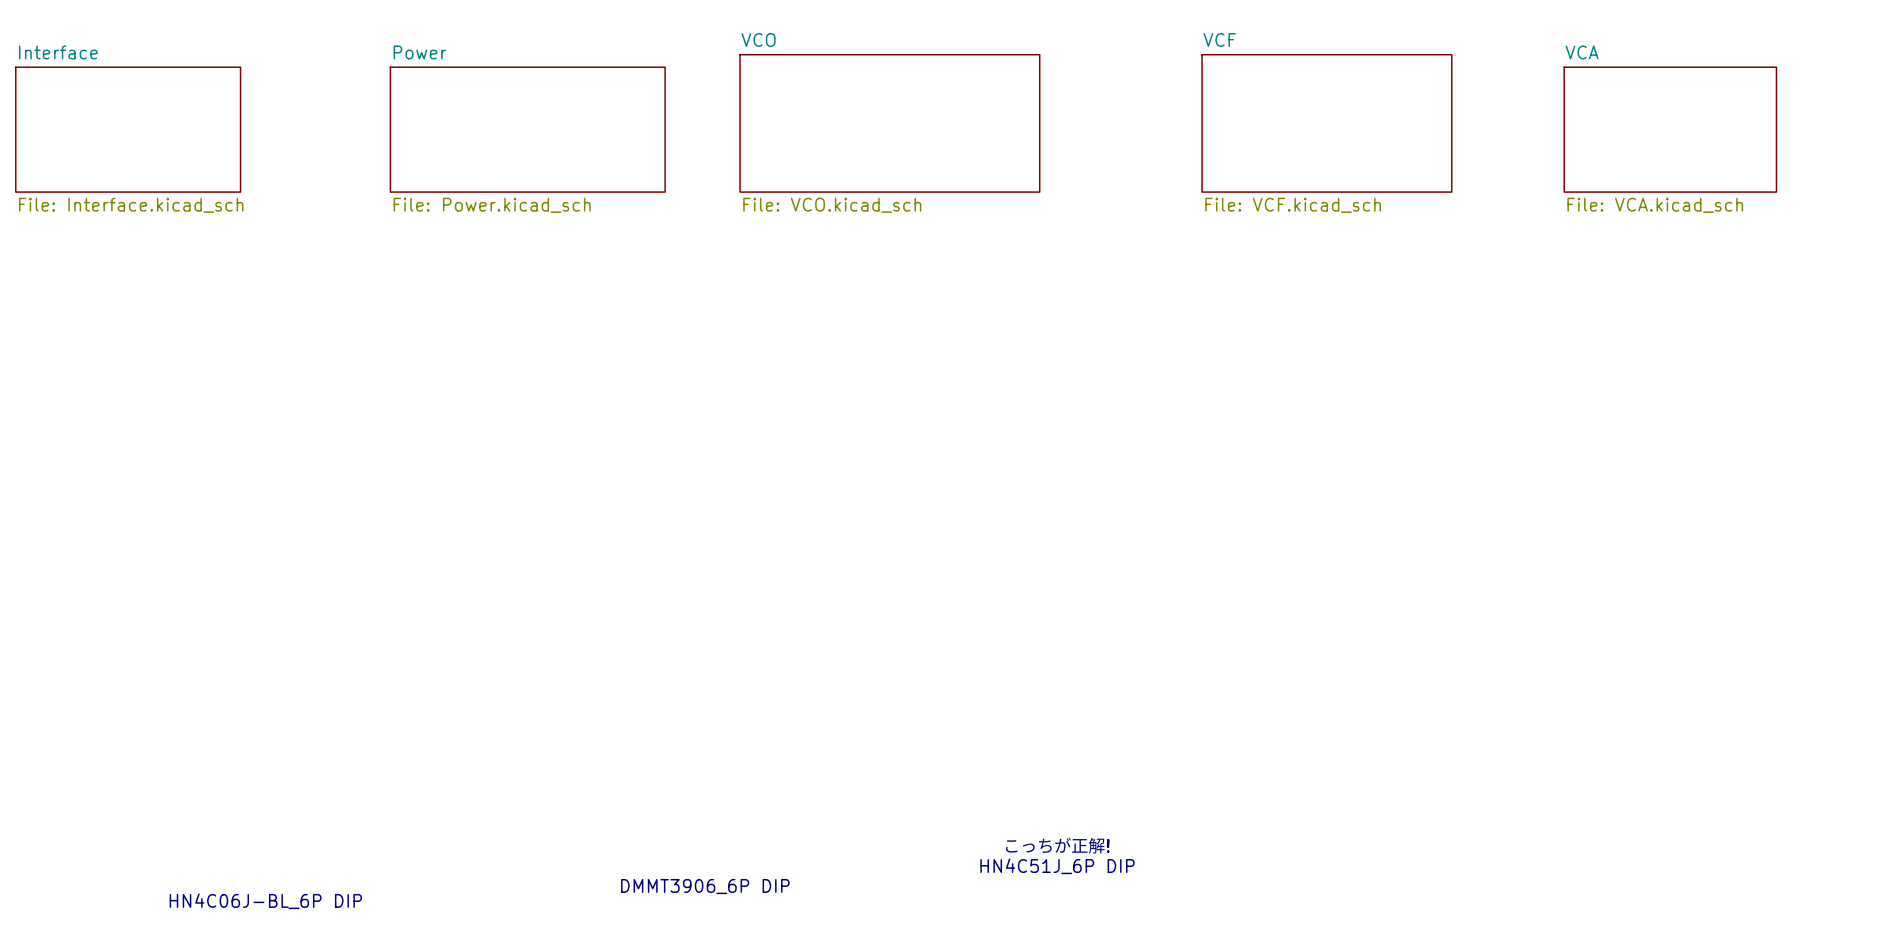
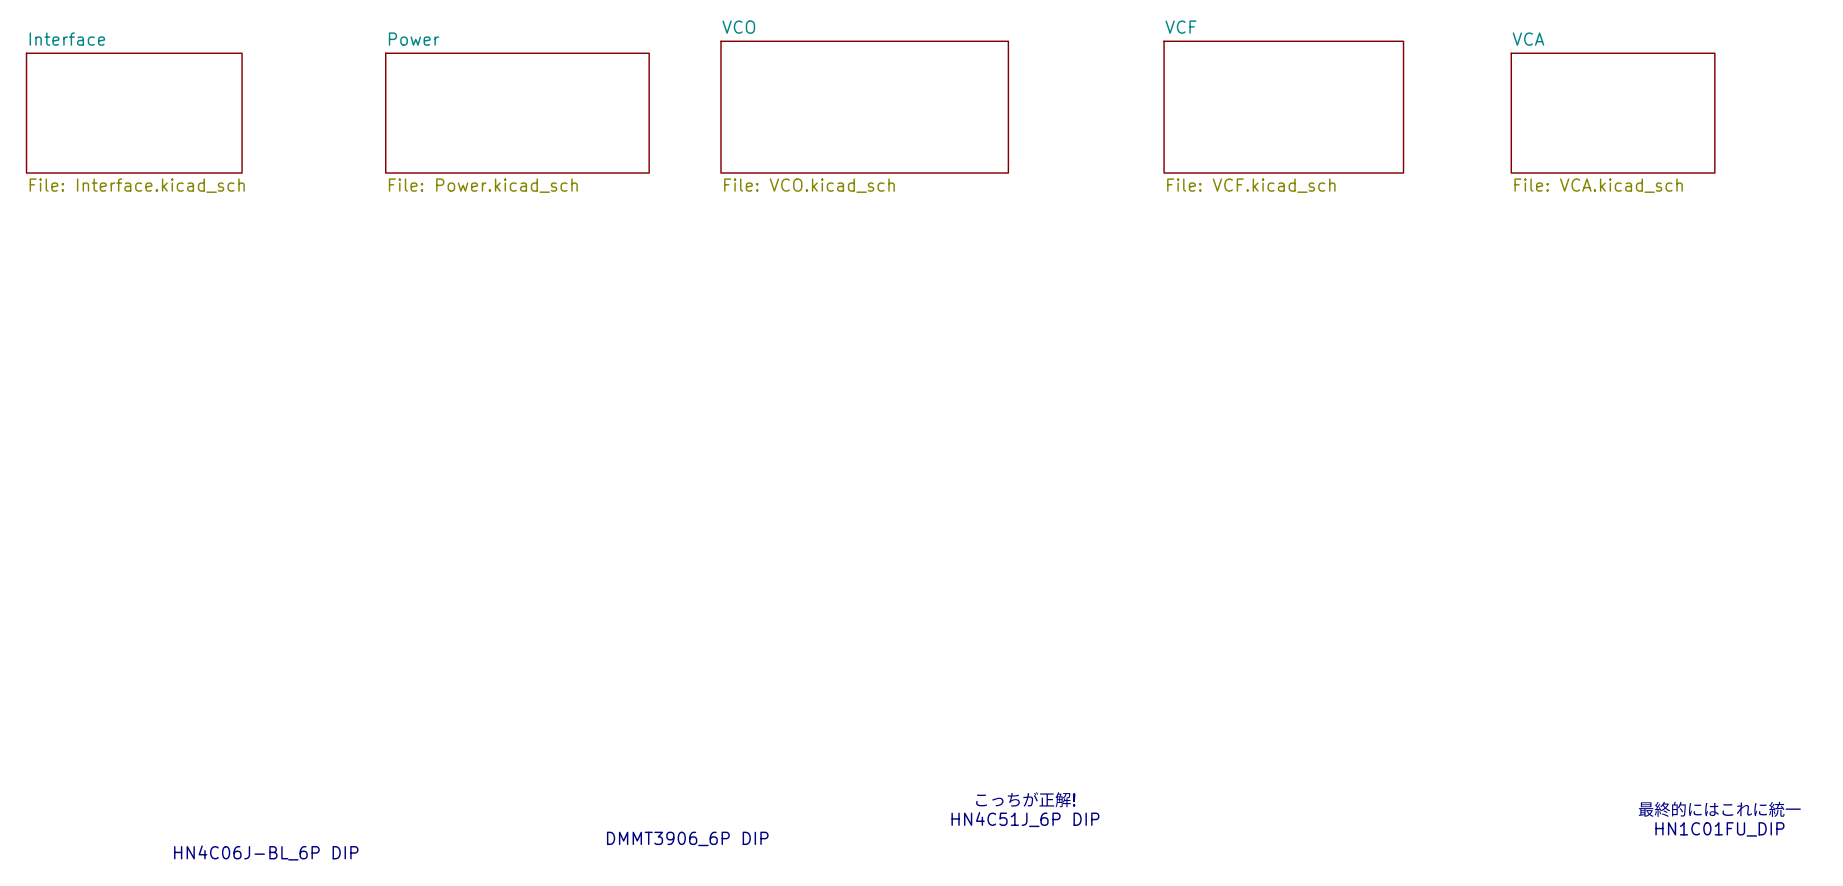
text: none -> 最終的にはこれに統一 (1719, 809)
text: none -> HN1C01FU_DIP (1719, 829)

